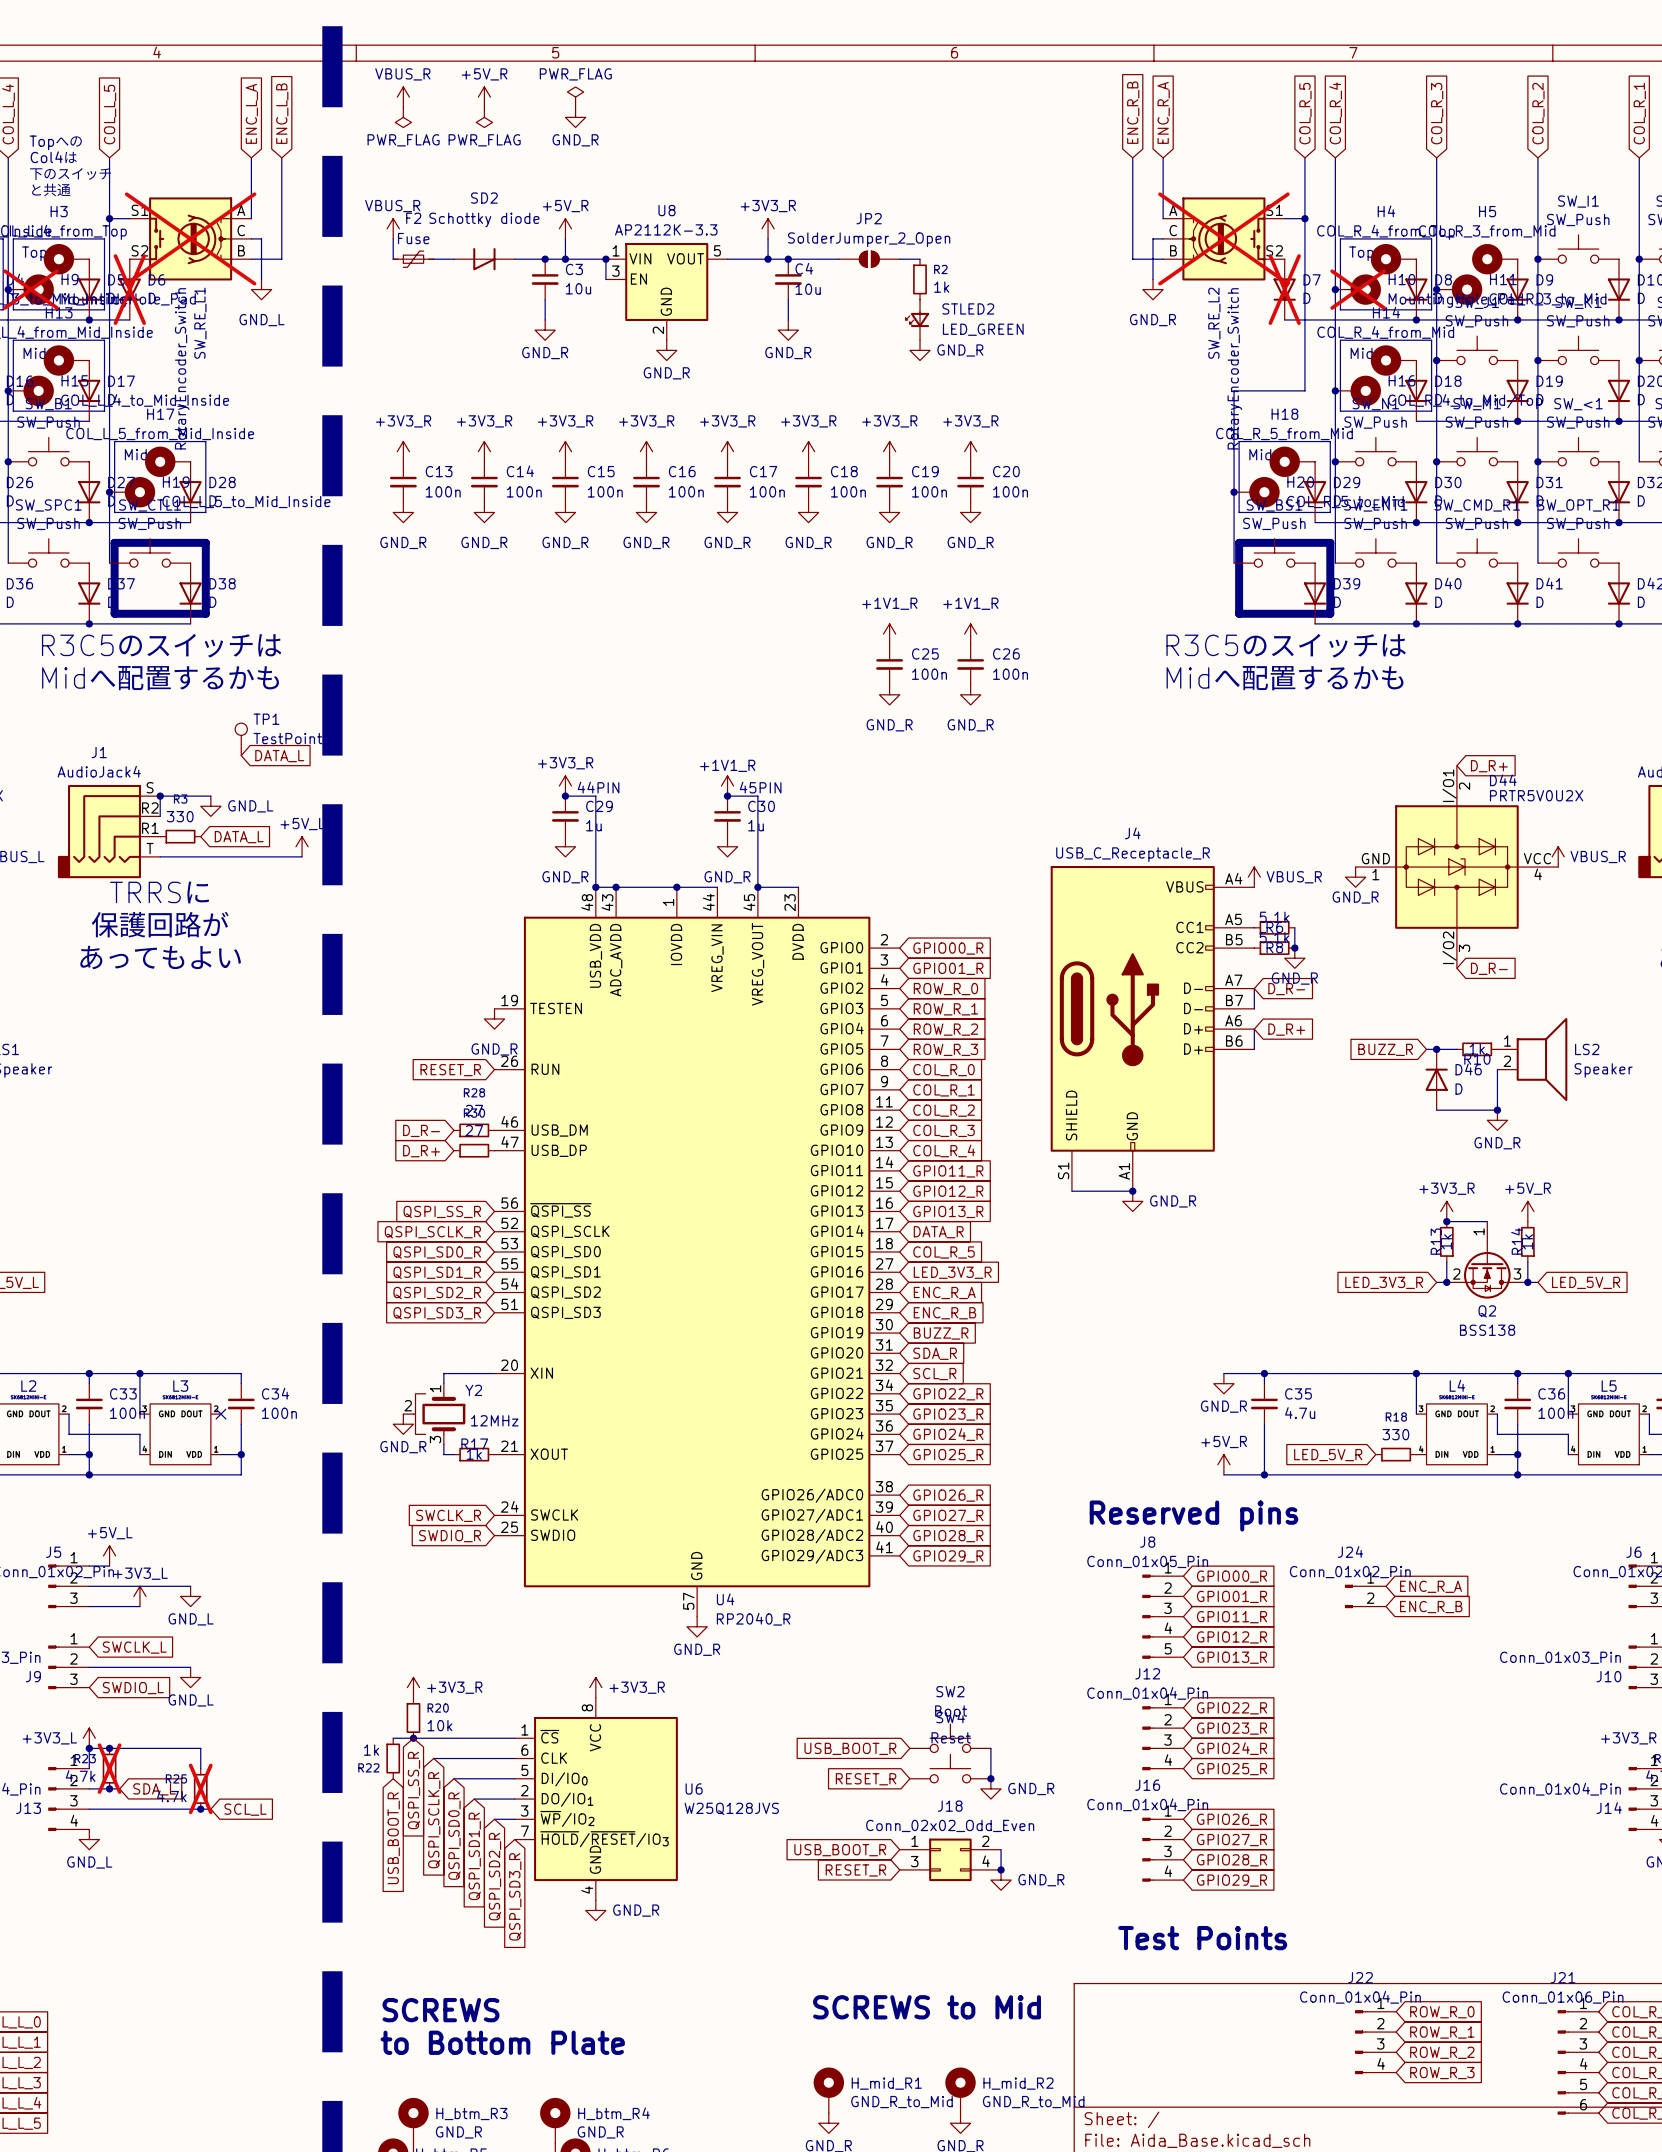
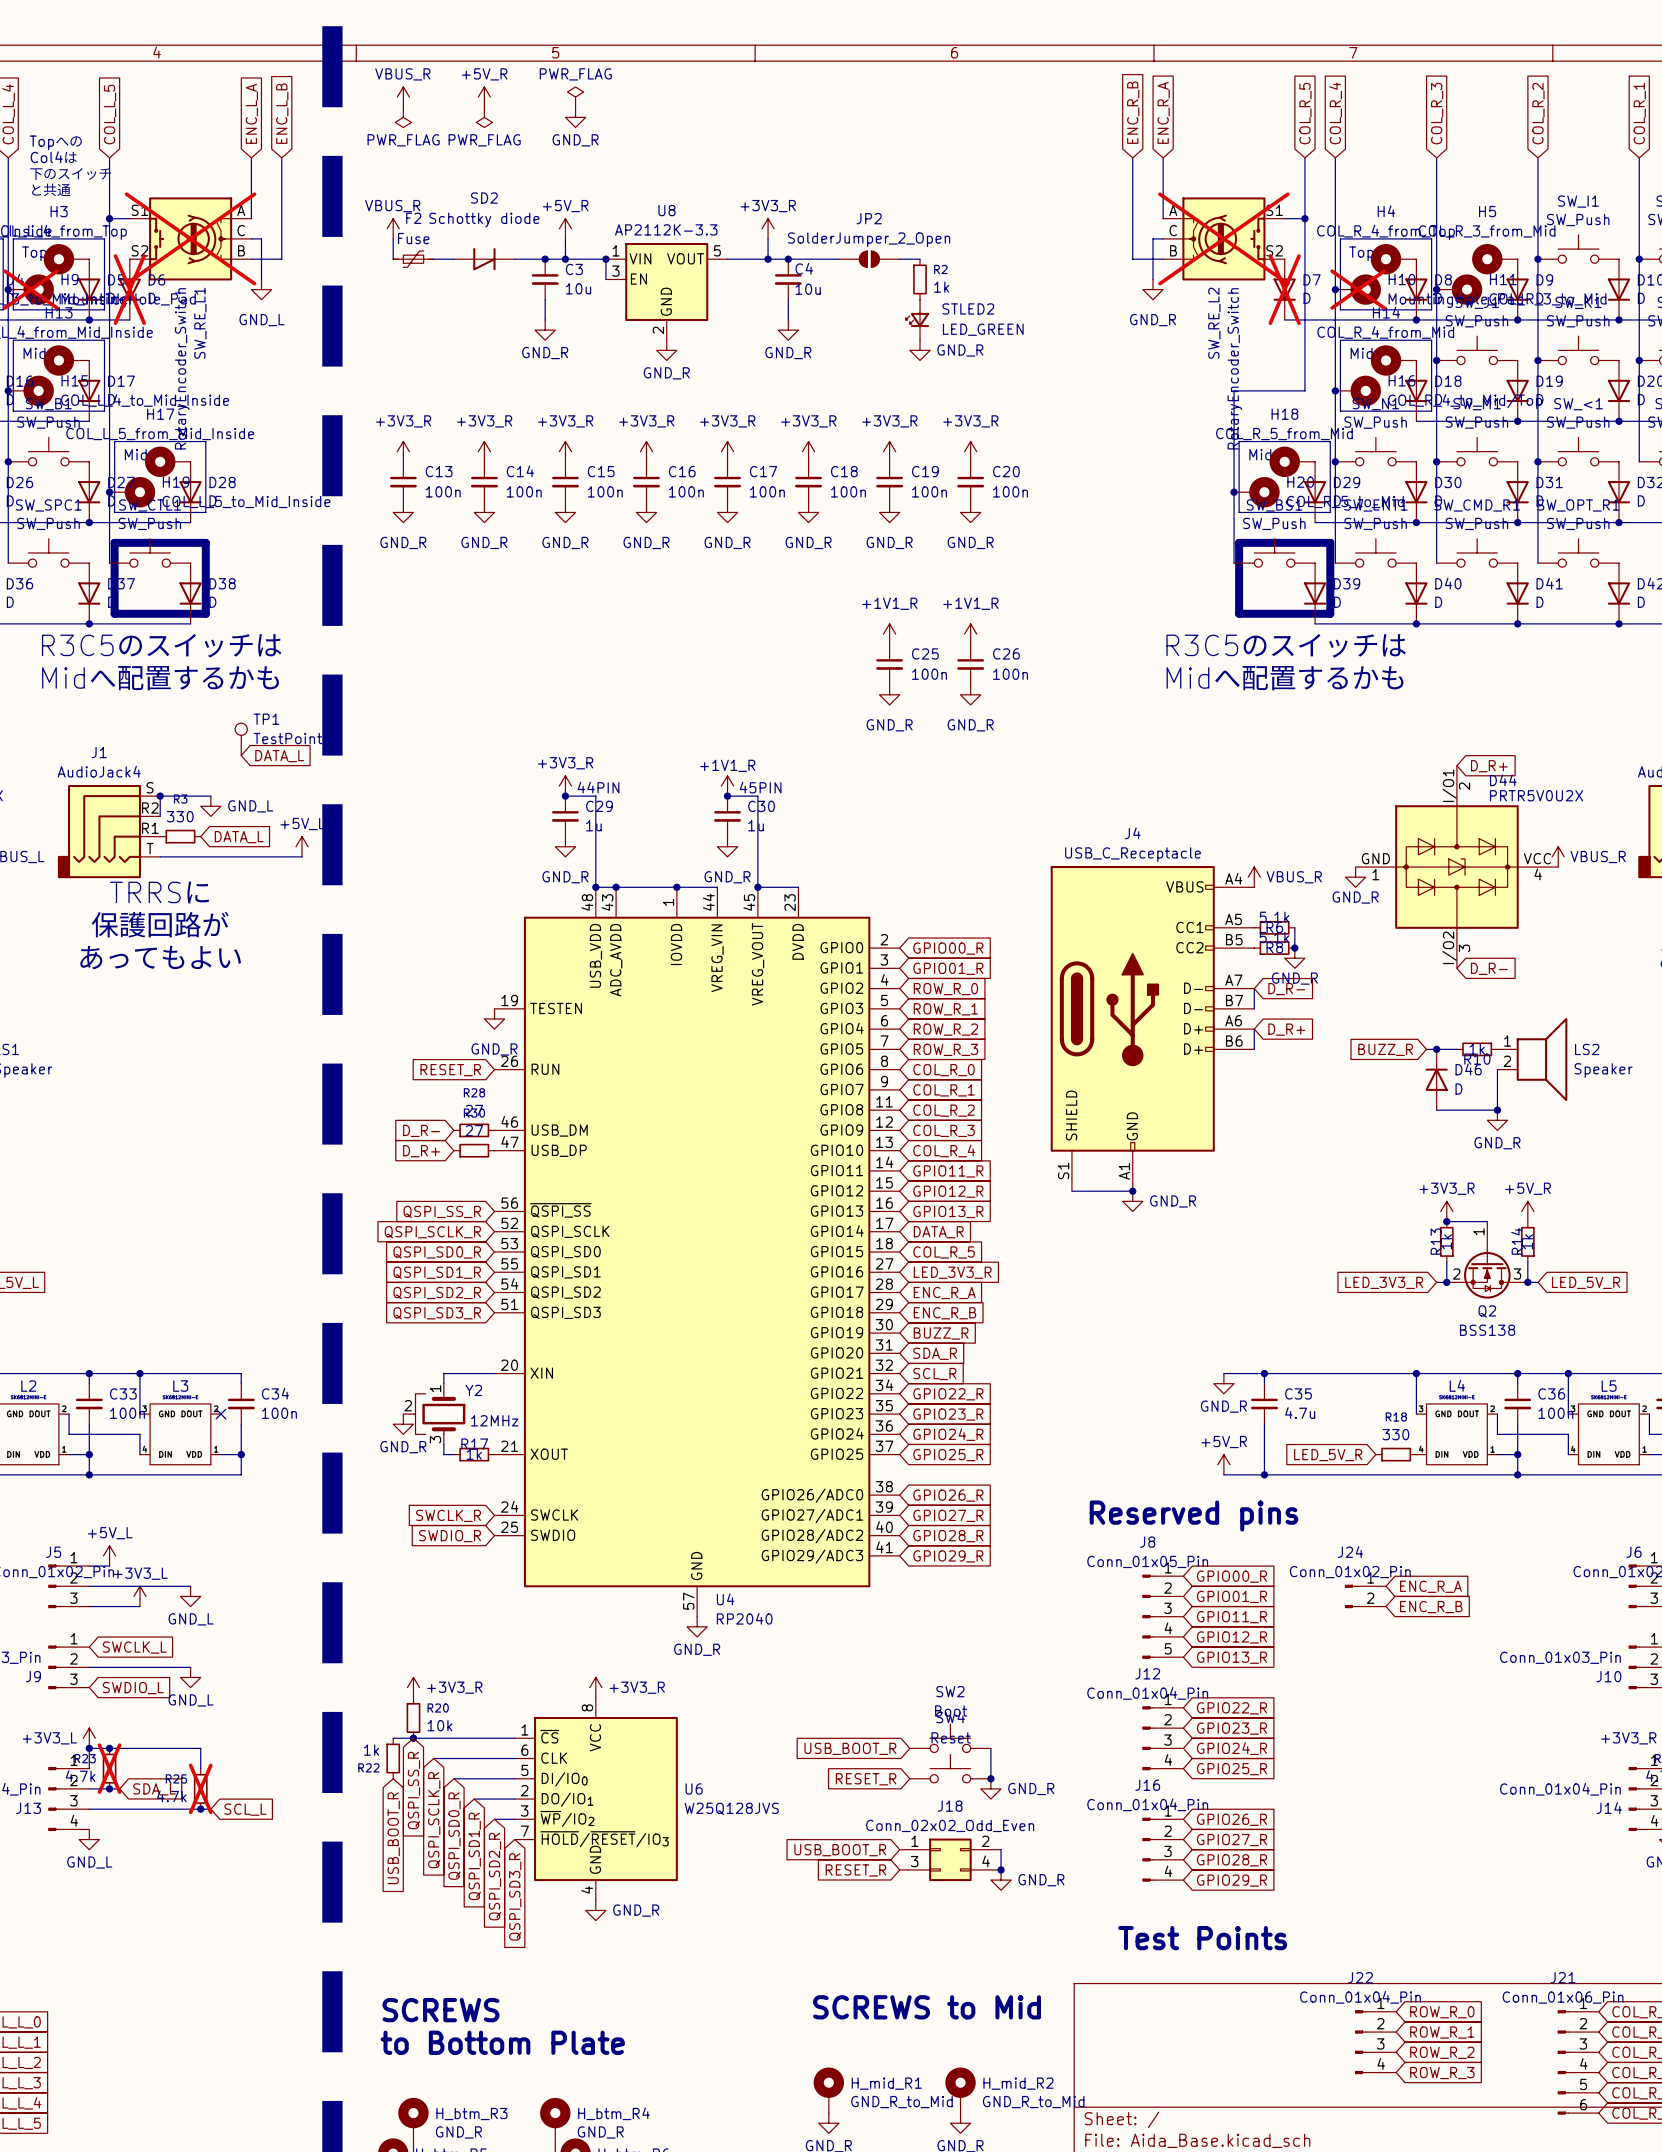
J4 value: USB_C_Receptacle_R (1132, 854) -> USB_C_Receptacle (1132, 854)
U4 value: RP2040_R (753, 1619) -> RP2040 (744, 1618)

